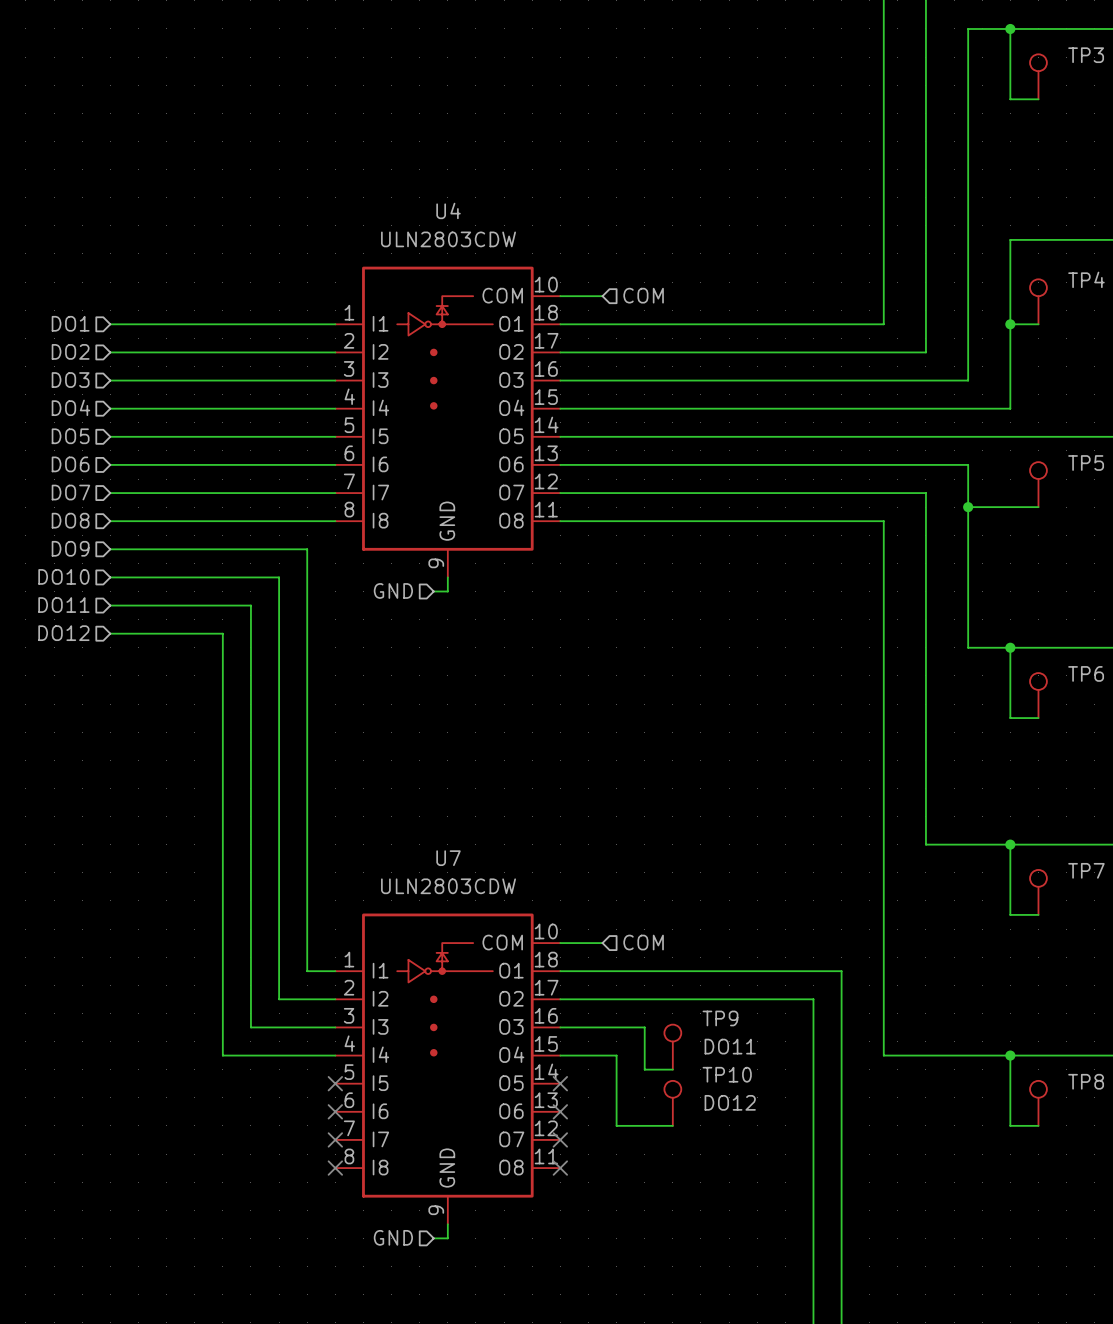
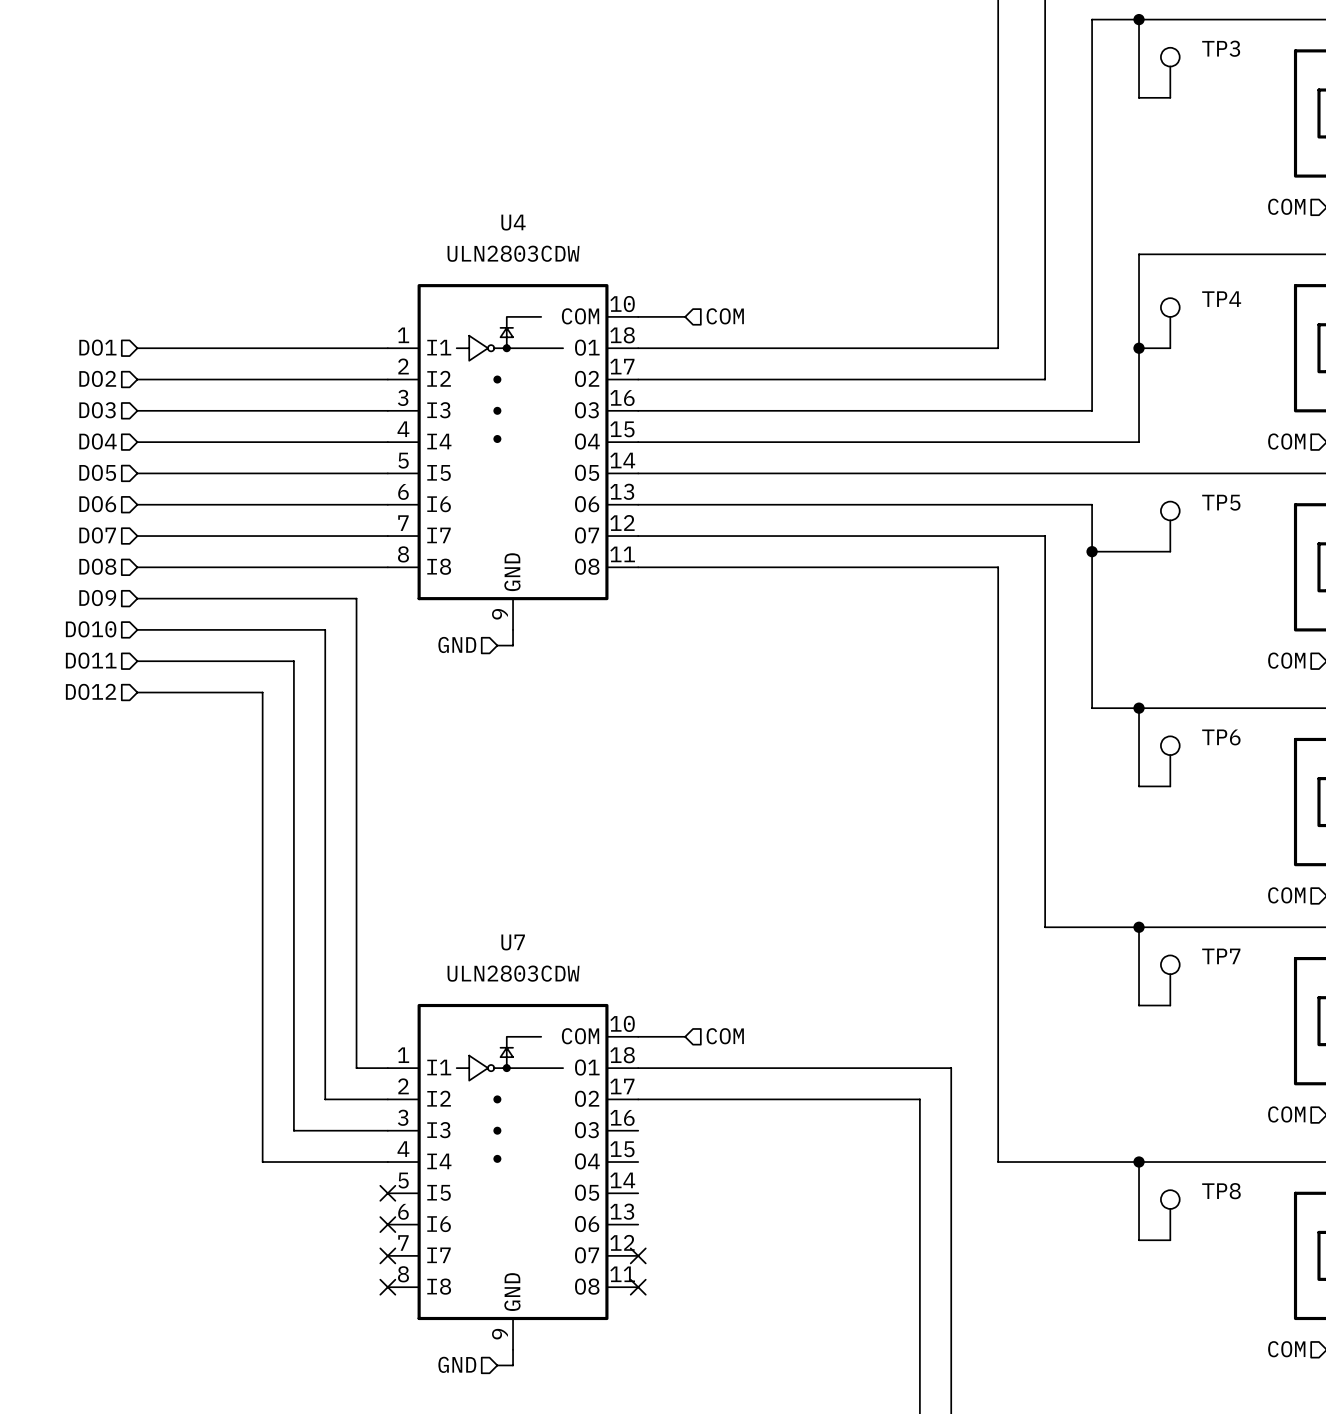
wire: (560, 1027) (644, 1027) (644, 1069) (672, 1069) -> none
TP9: DO11 (672, 1047) -> none
wire: (560, 1055) (616, 1055) (616, 1125) (672, 1125) -> none
no-connect mark: (560, 1083) -> none
TP10: DO12 (672, 1103) -> none
no-connect mark: (560, 1111) -> none

